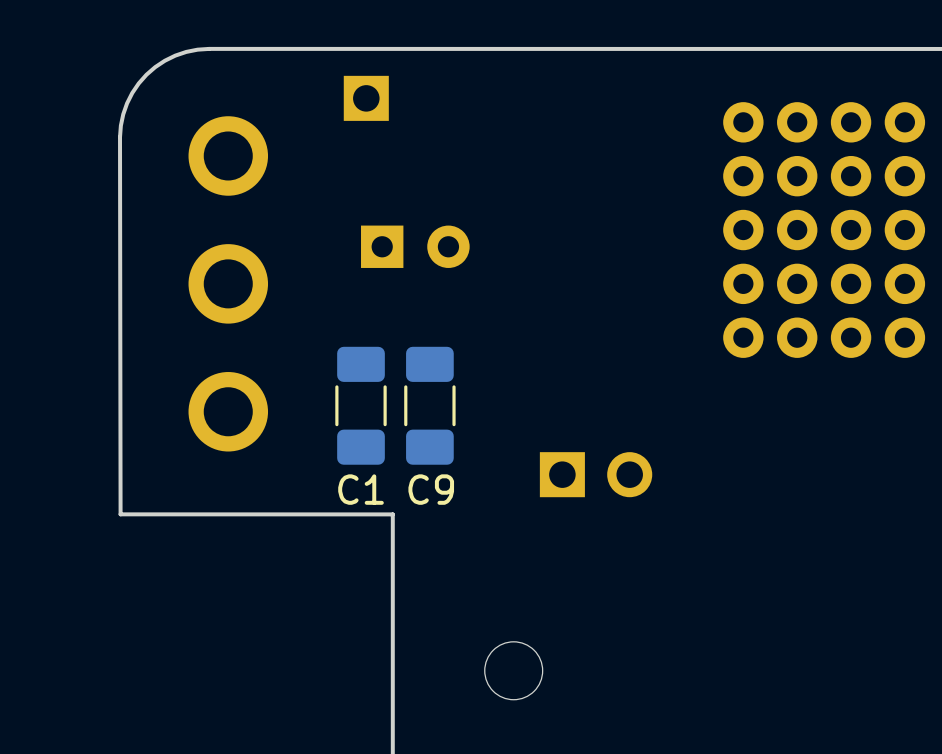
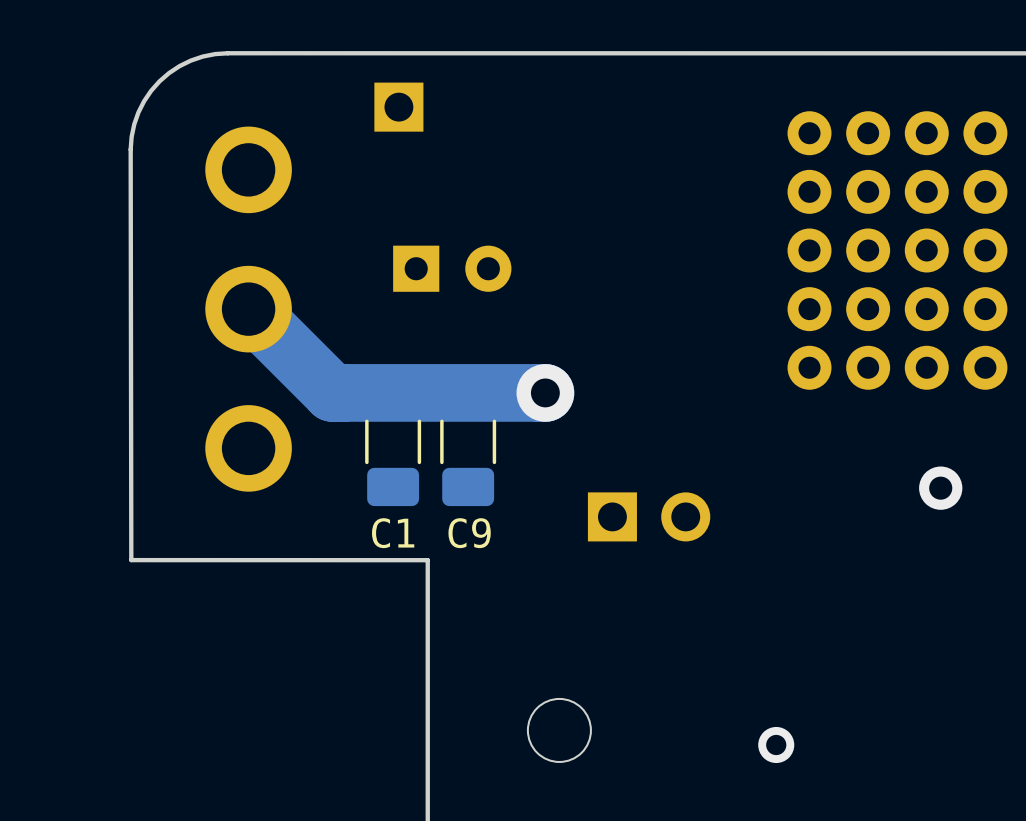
track: none -> (248, 309) (332, 392) (545, 392)
via: none -> (545, 392)
via: none -> (940, 488)
via: none -> (776, 744)

